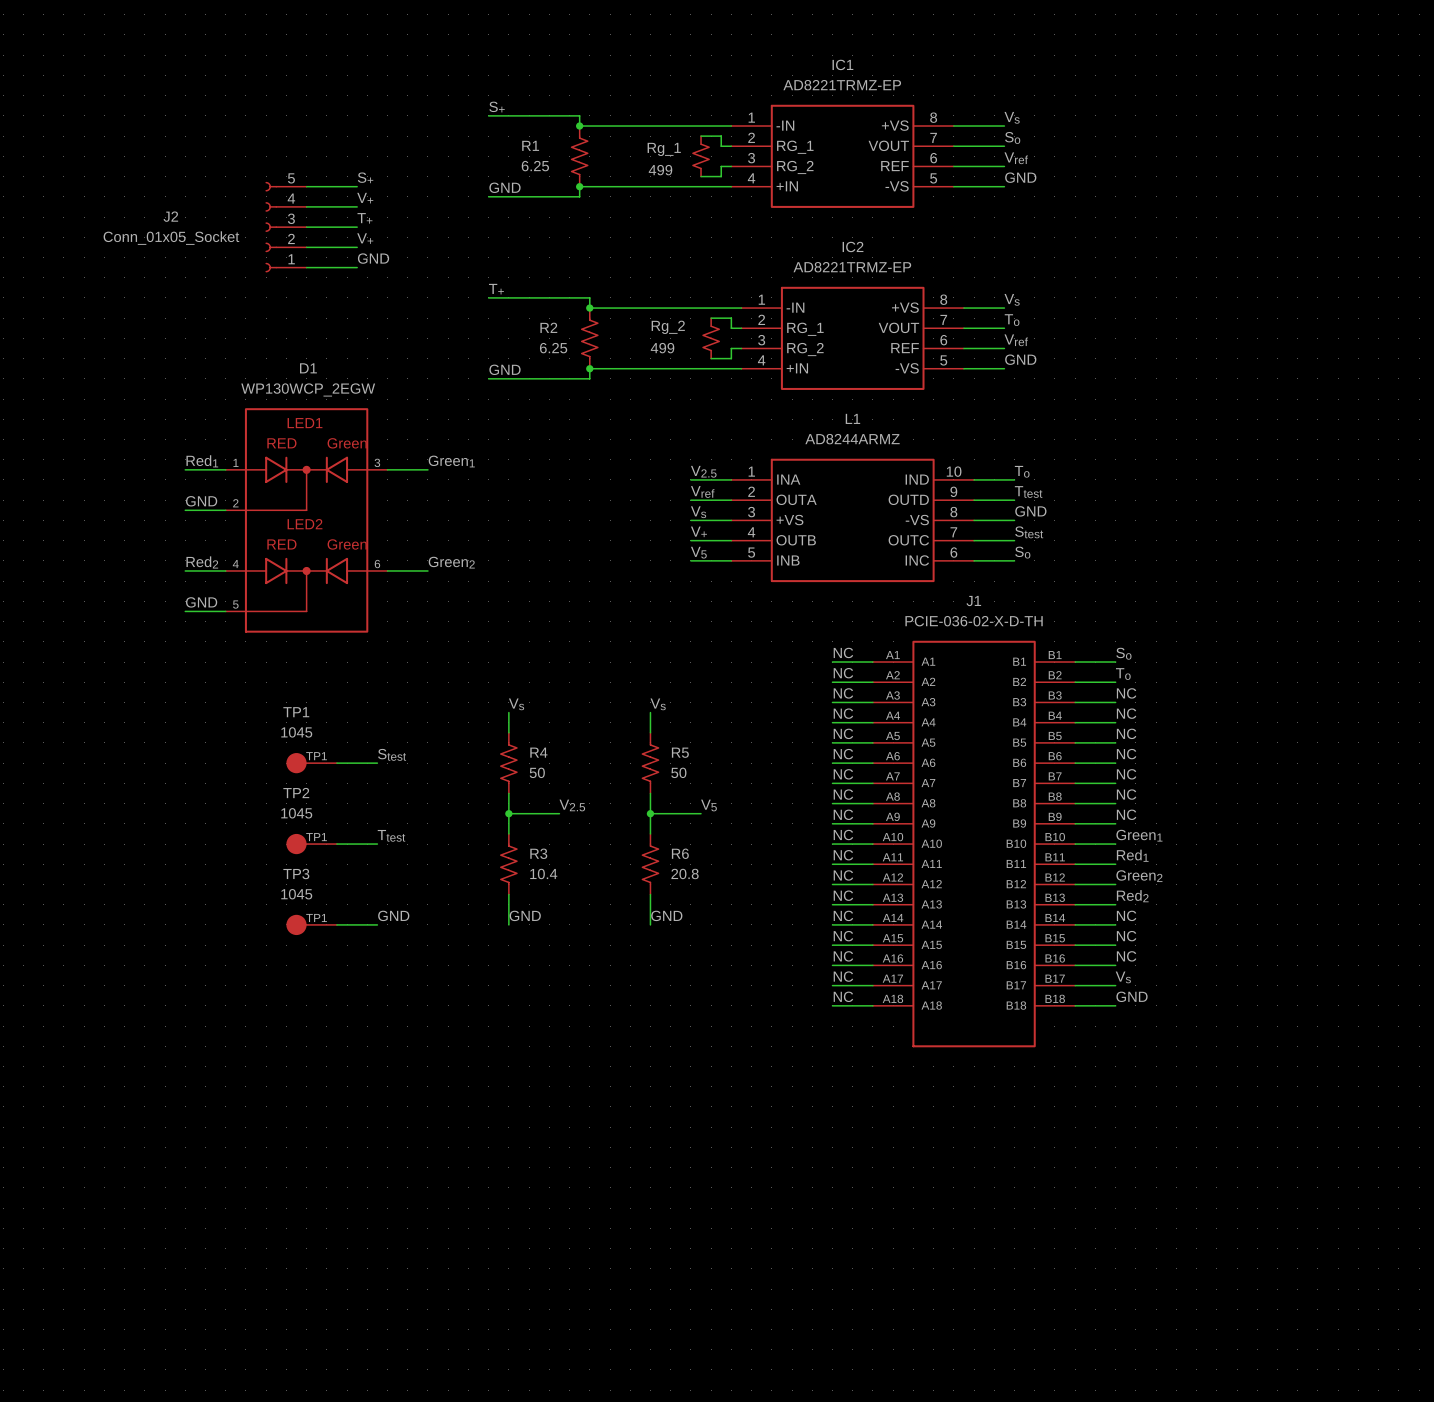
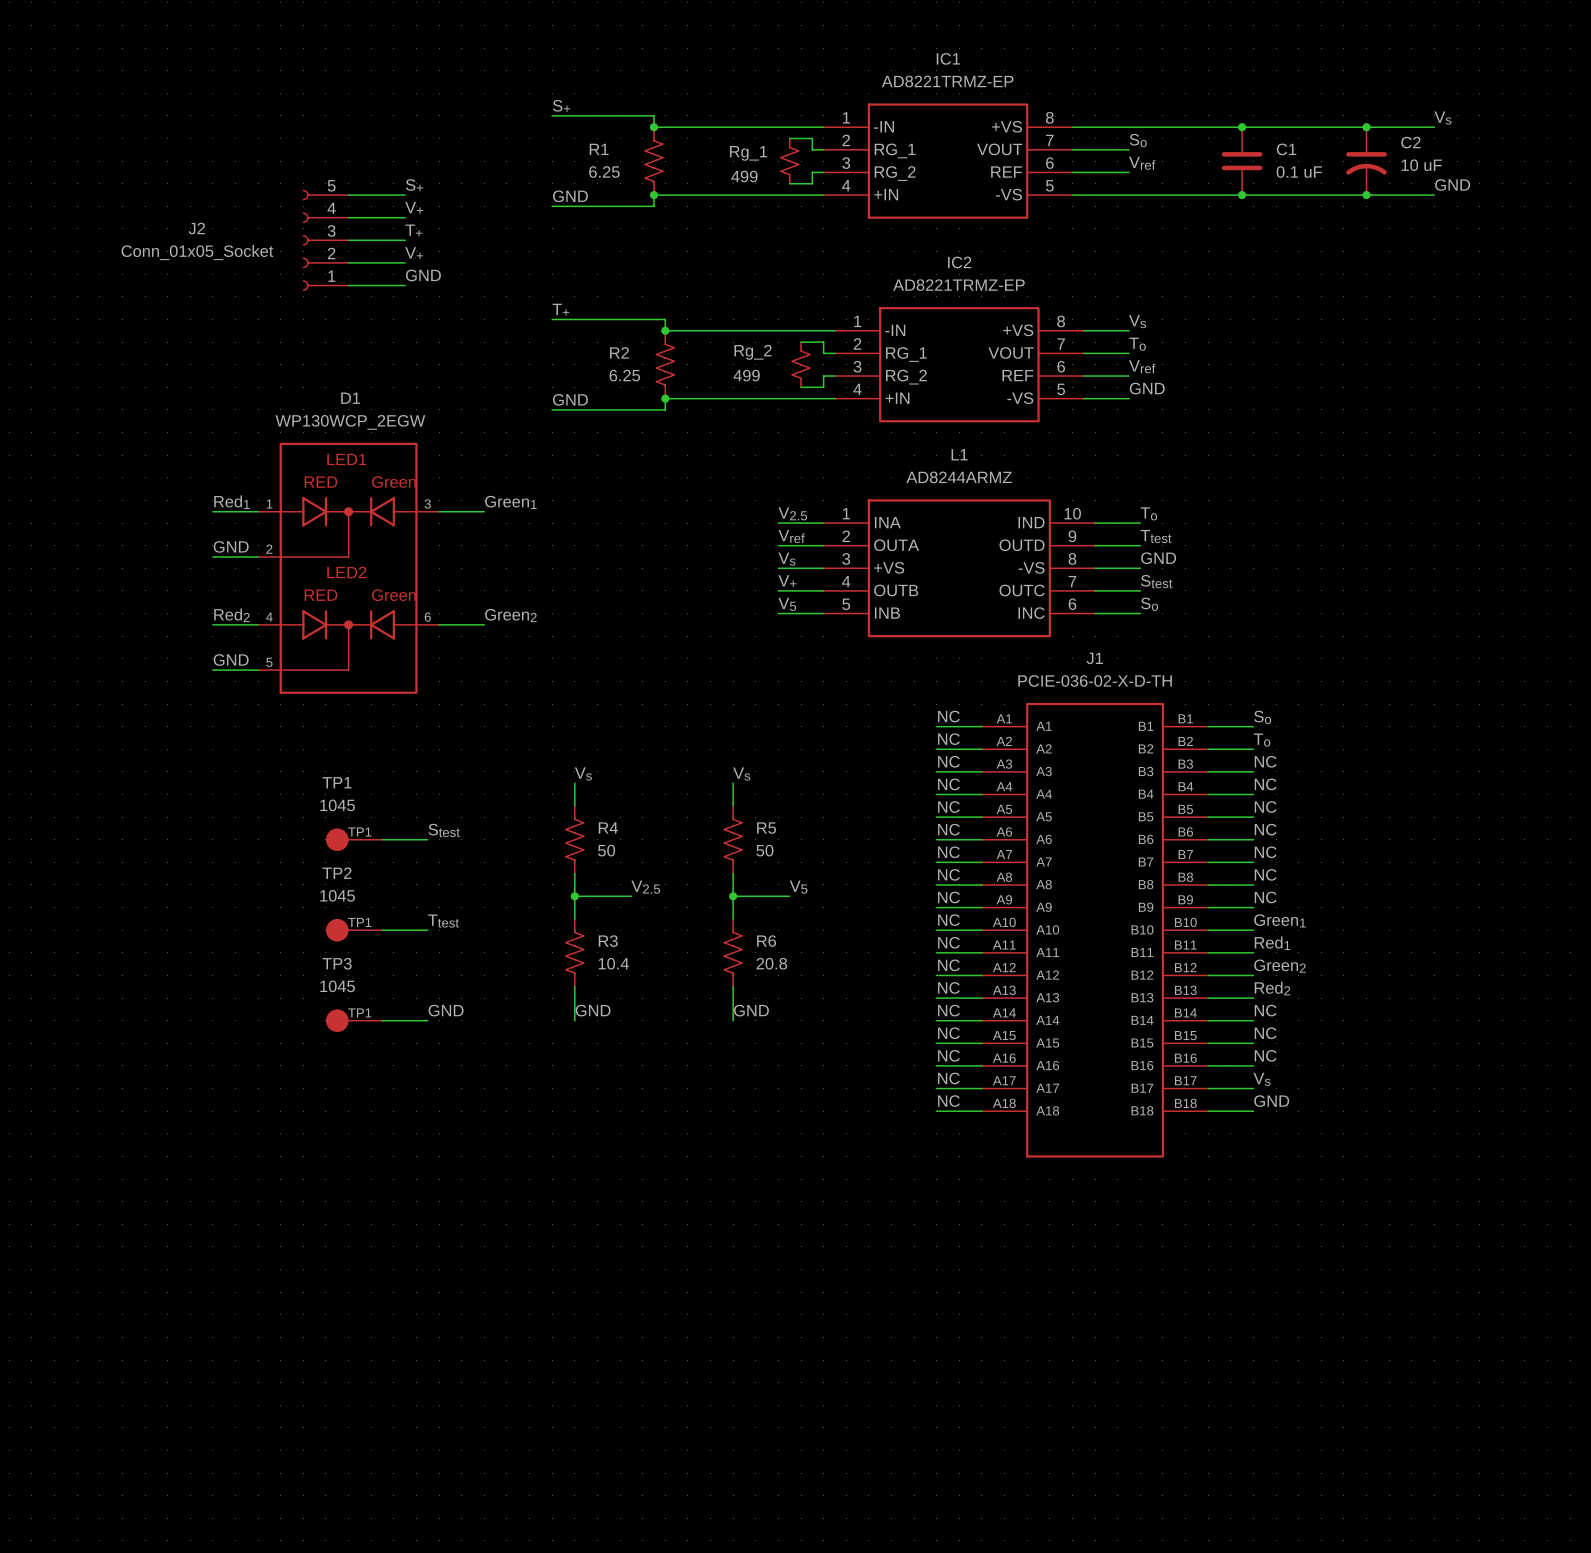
label: Vs (1012, 117) -> none
label: none -> Vs (1442, 118)
wire: none -> (1129, 127) (1434, 127)
junction: none -> (1242, 127)
junction: none -> (1366, 127)
C1: none -> 0.1 uF (1242, 161)
C2: none -> 10 uF (1366, 161)
label: GND (1020, 177) -> none
label: none -> GND (1452, 184)
wire: none -> (1129, 195) (1434, 195)
junction: none -> (1242, 195)
junction: none -> (1366, 195)

